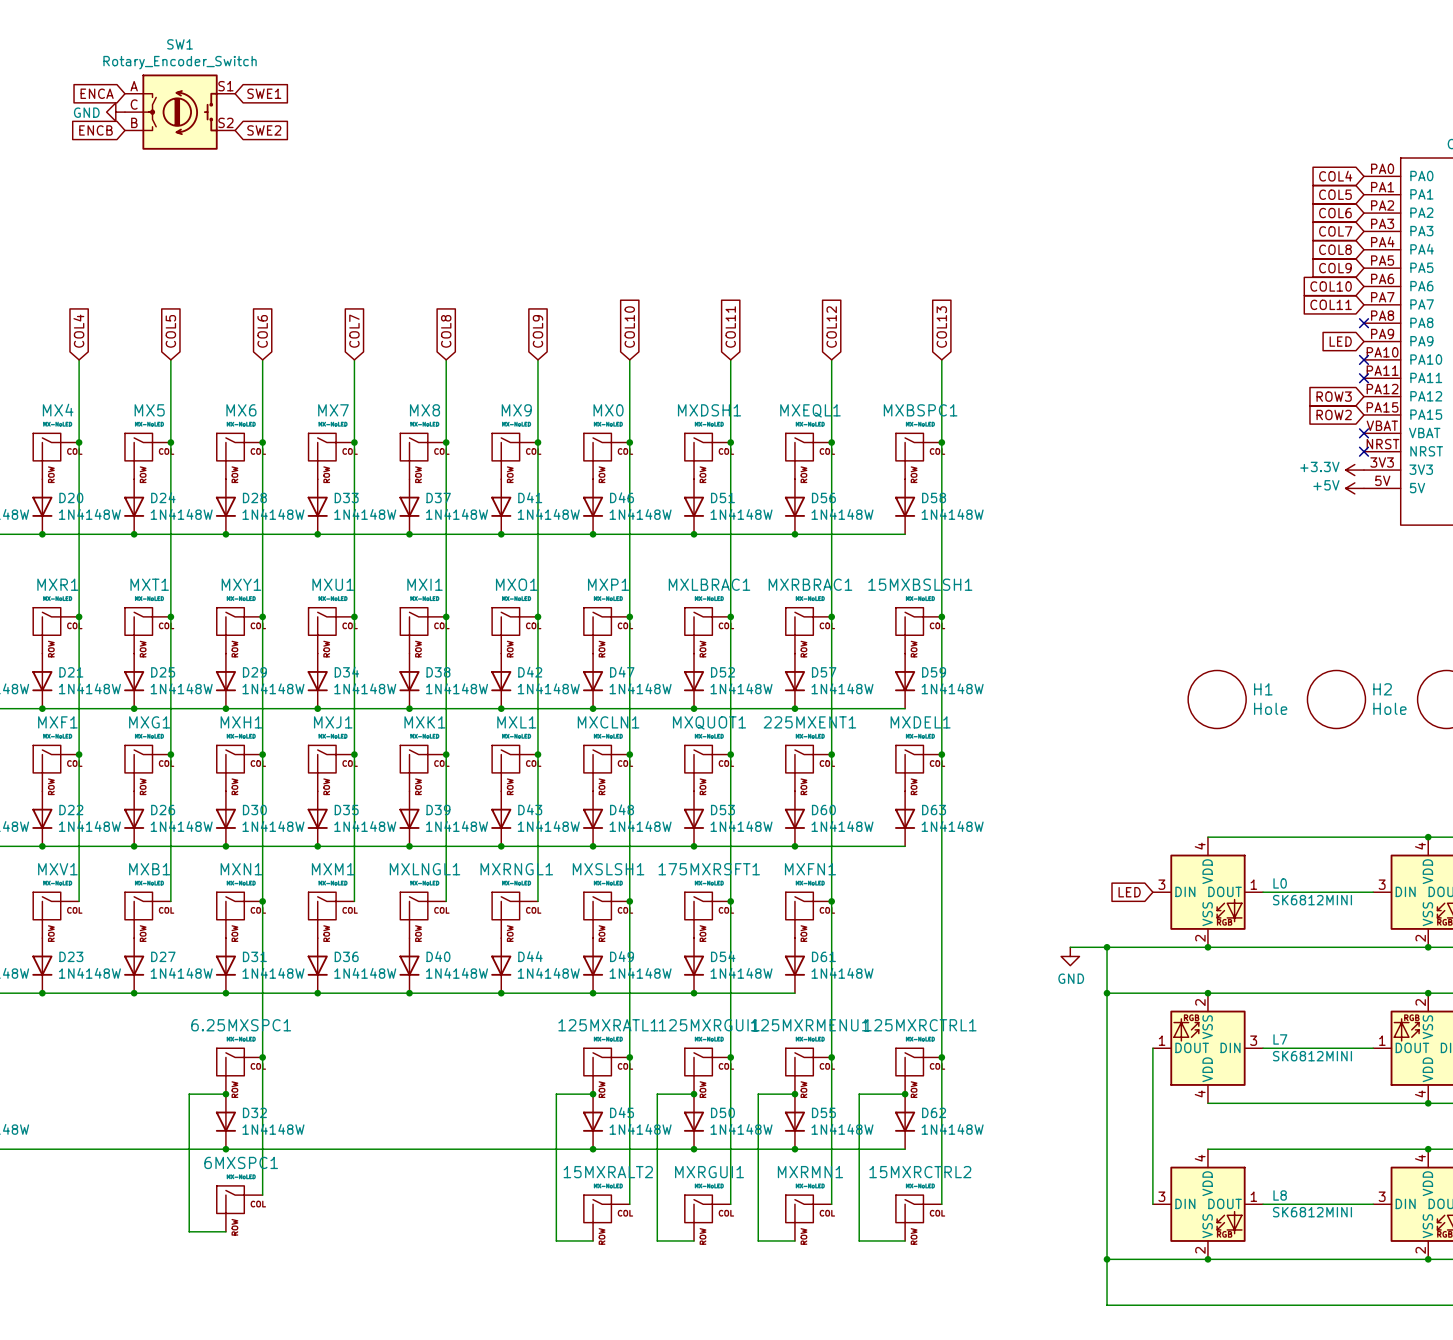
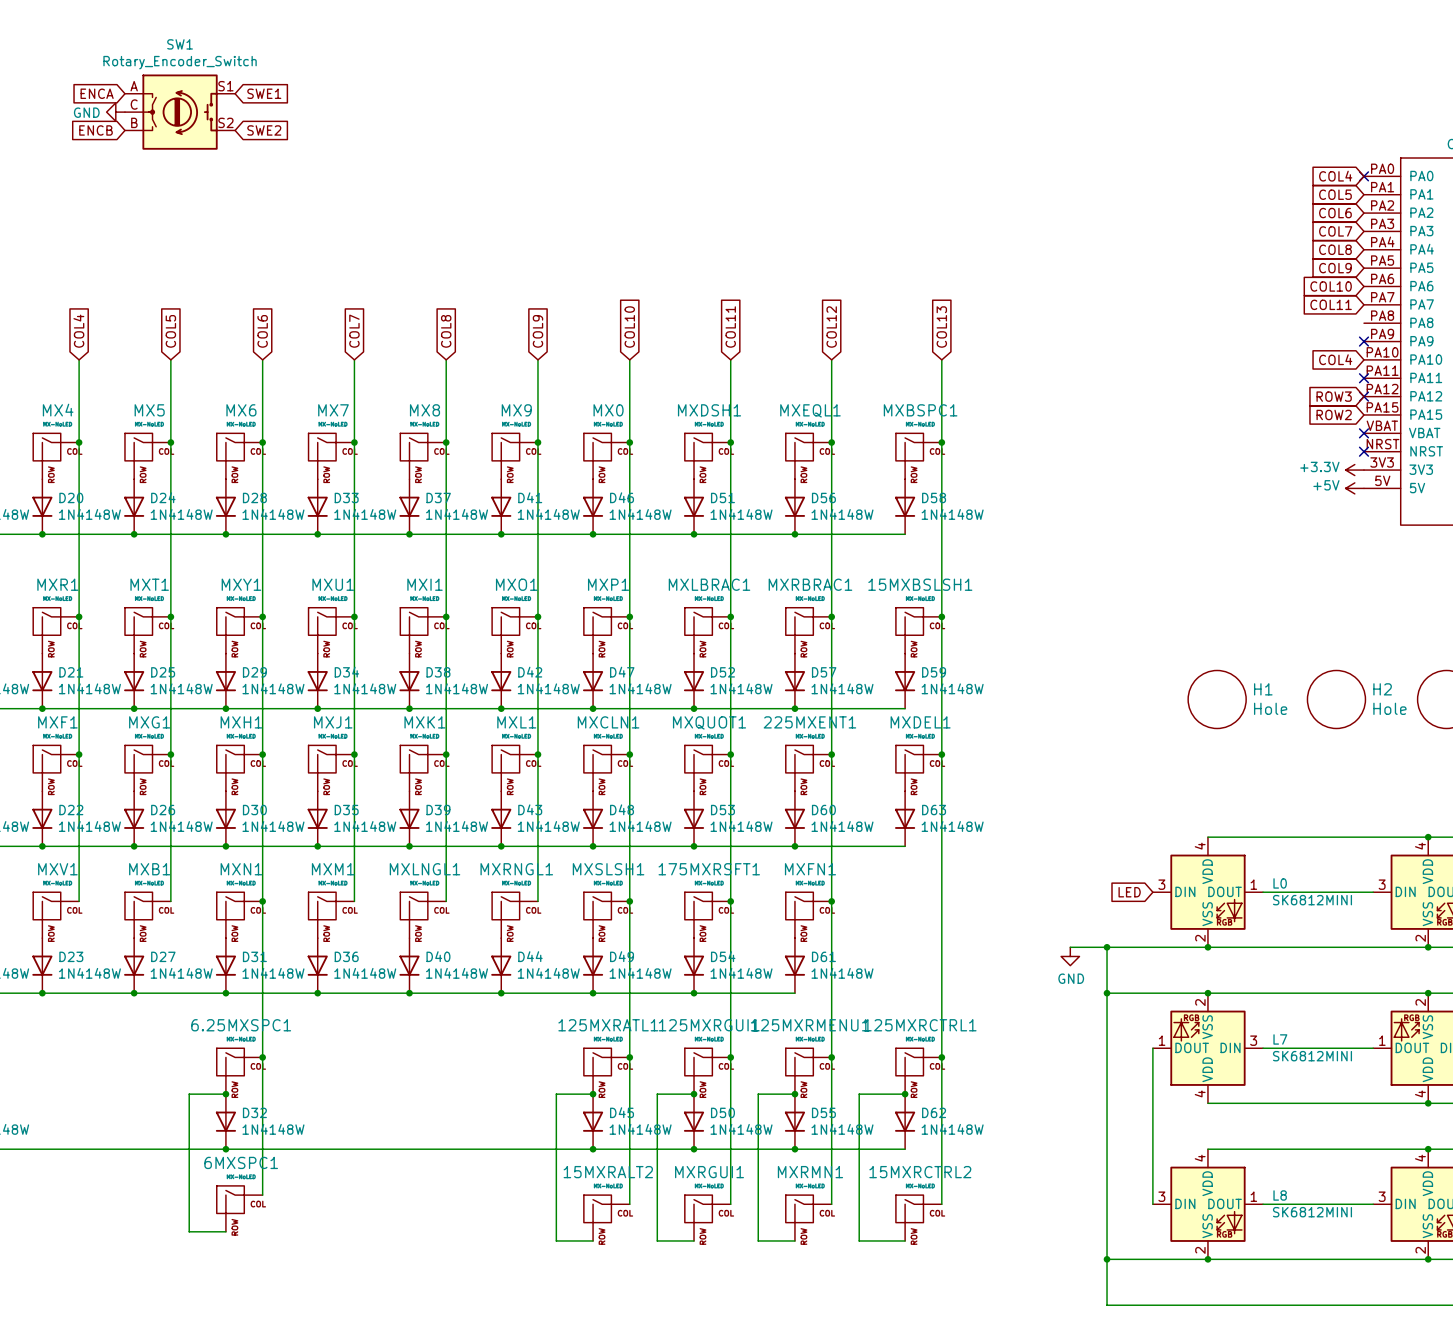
no-connect mark: none -> (1363, 176)
no-connect mark: (1363, 323) -> none
global label: LED (1340, 341) -> none
no-connect mark: none -> (1363, 341)
global label: none -> COL4 (1335, 359)
no-connect mark: (1363, 359) -> none
no-connect mark: none -> (1363, 396)

